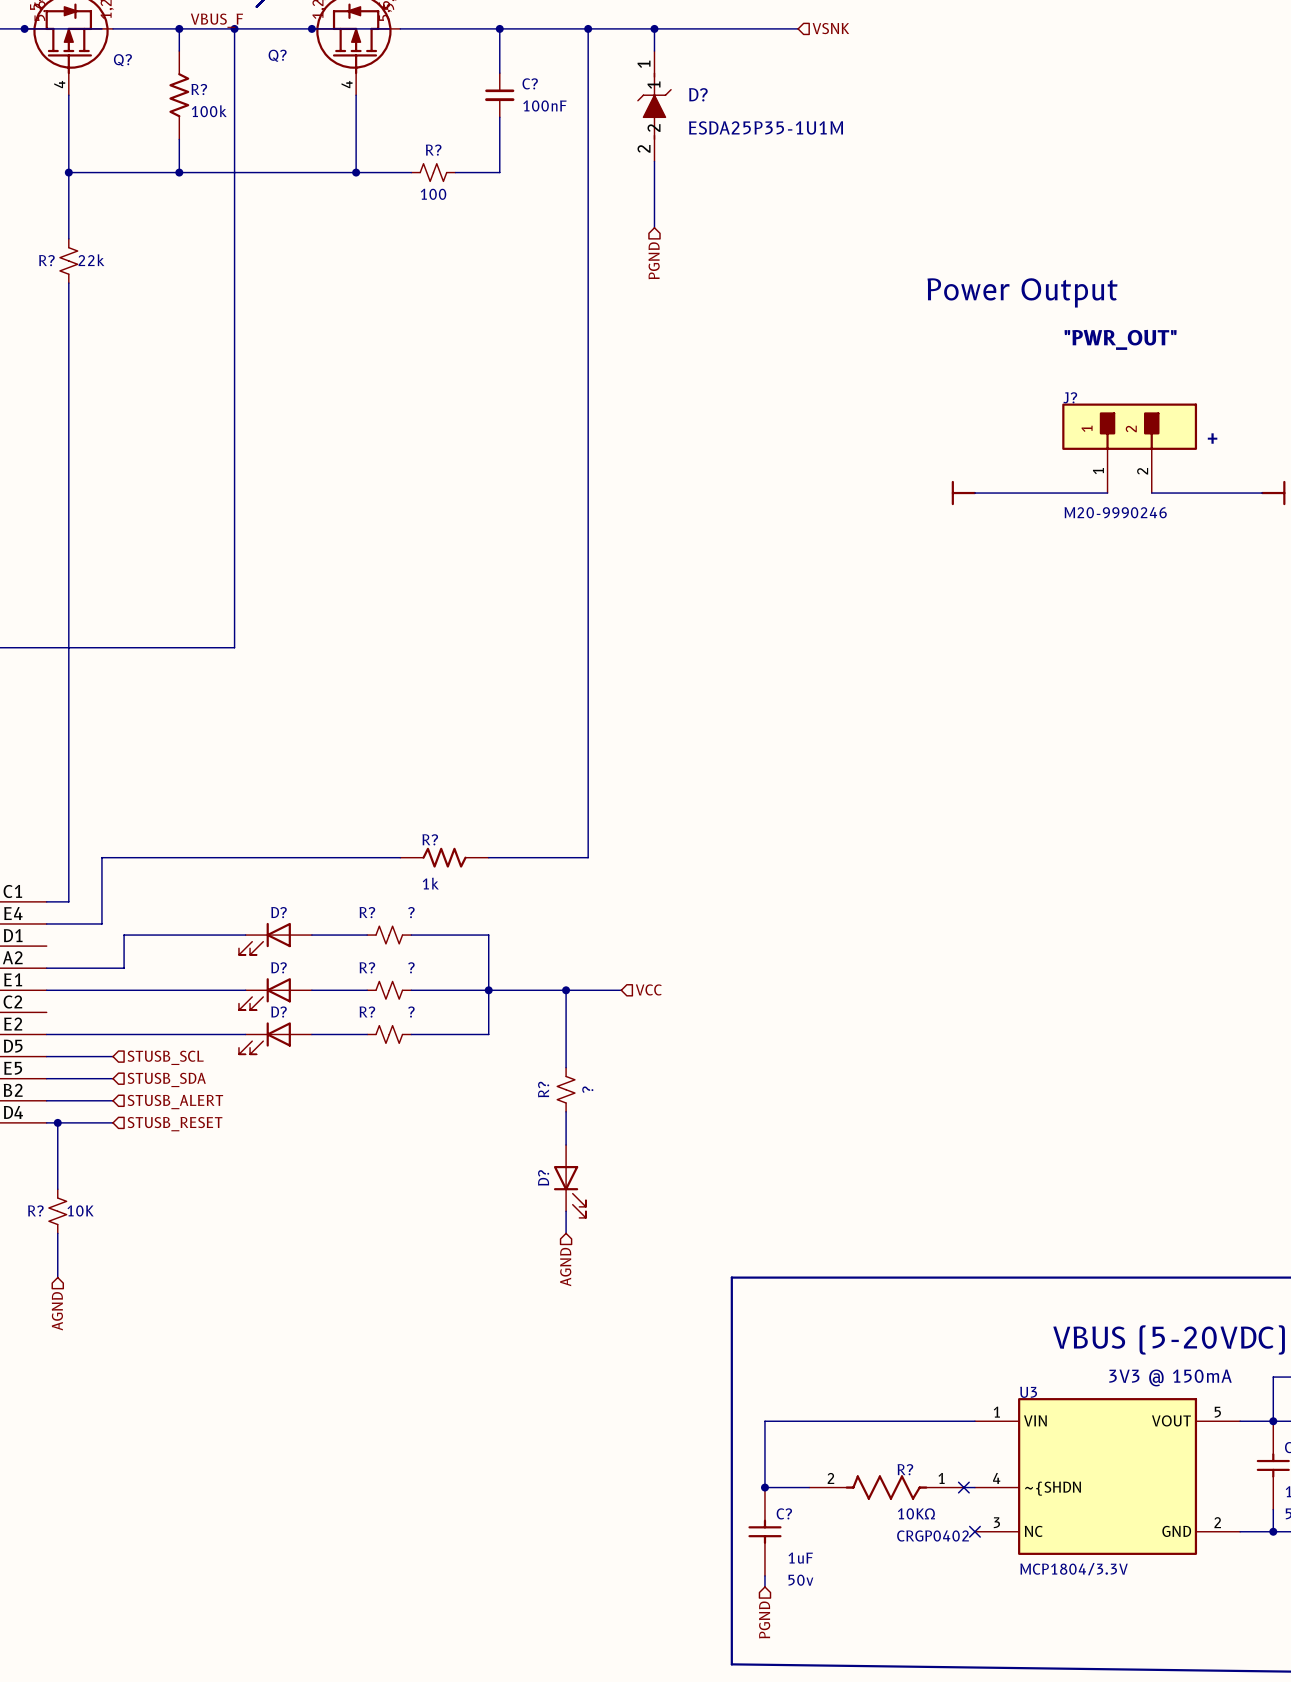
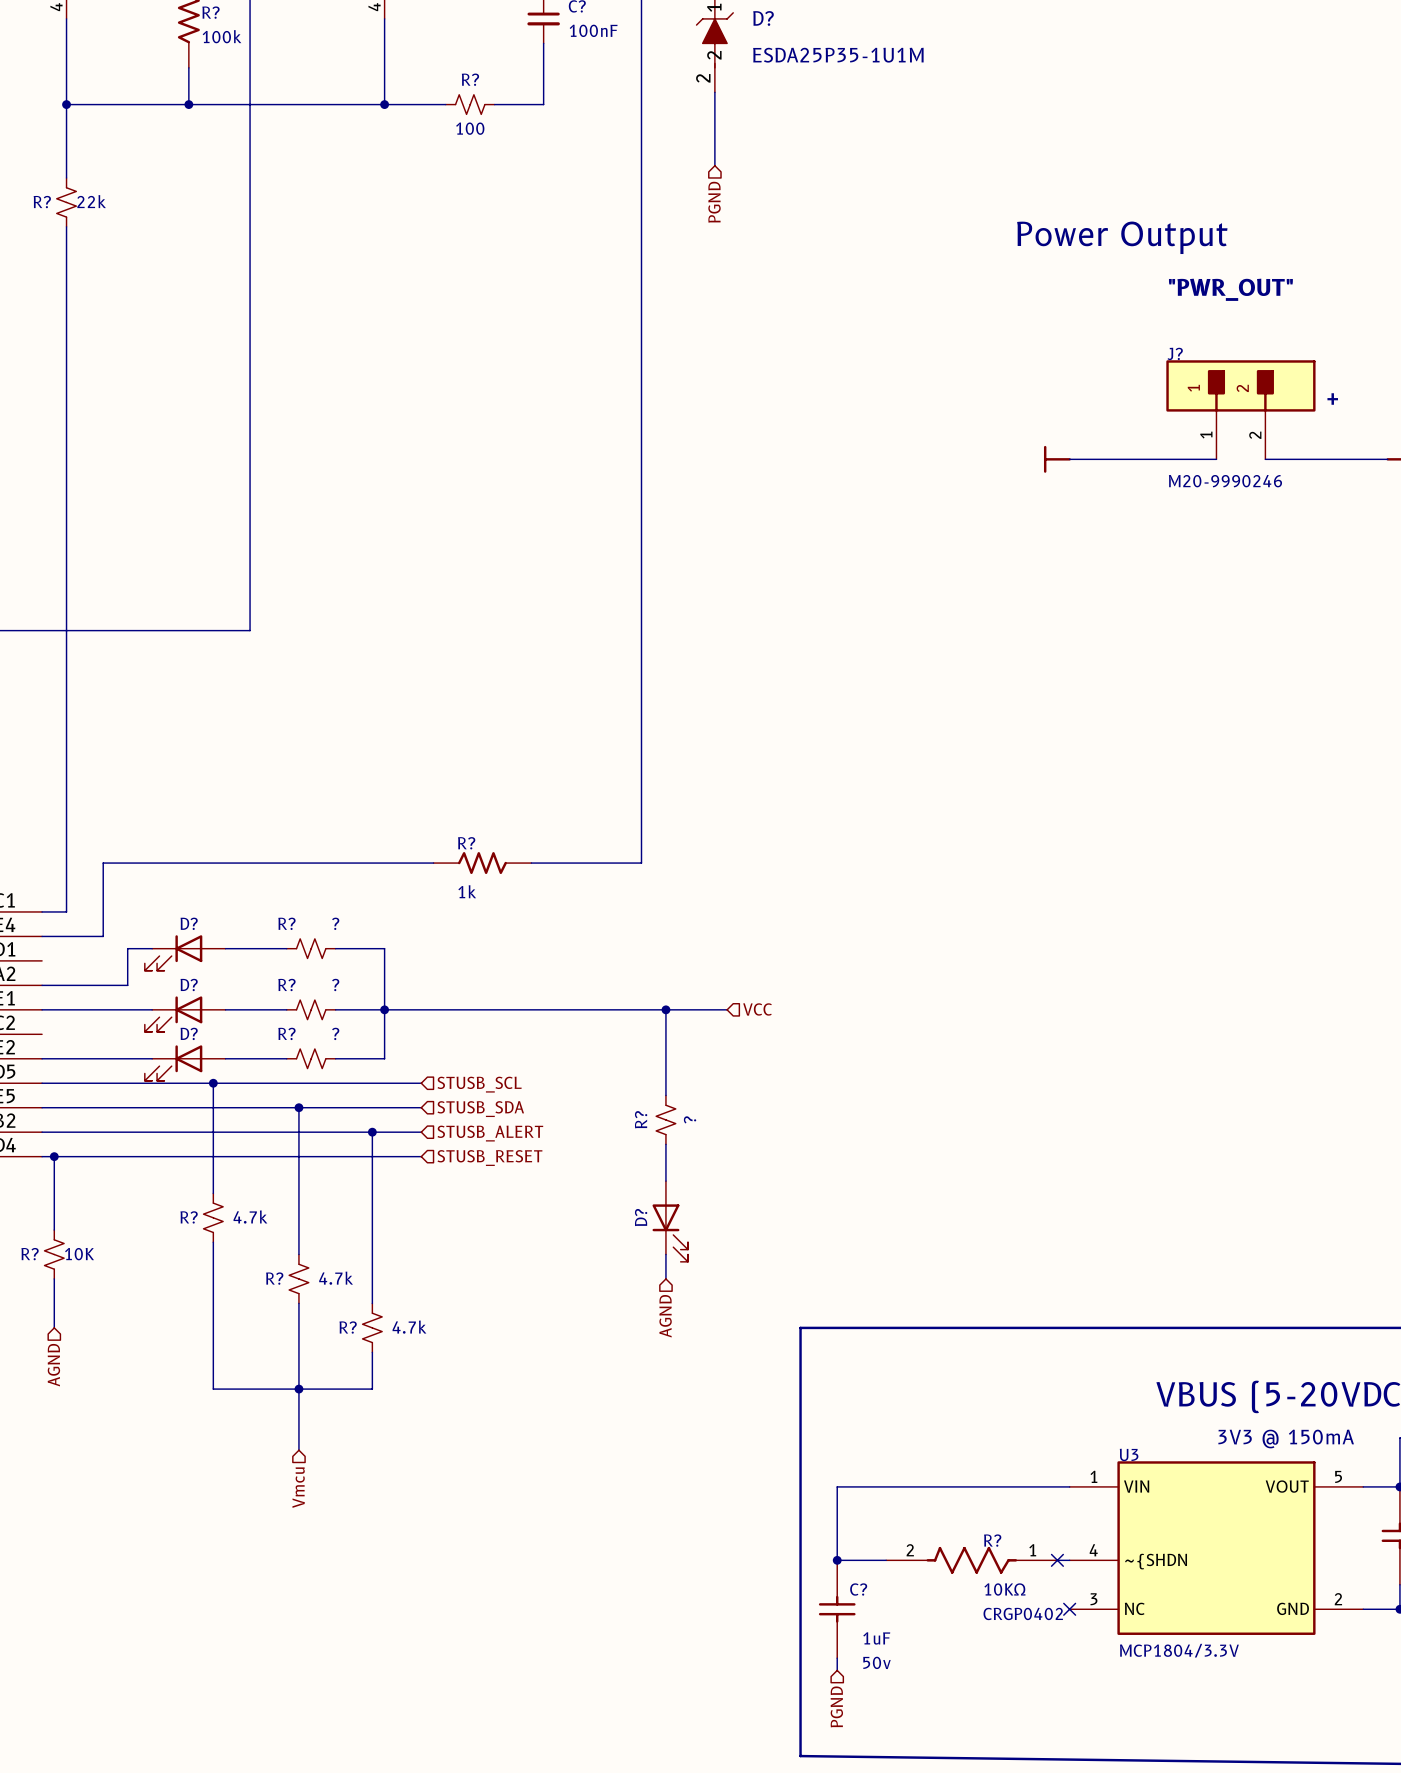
R?: none -> ? (311, 948)
wire: (356, 935) (367, 935) -> (384, 948) (384, 1058)
R?: ? (389, 935) -> none
wire: (411, 935) (488, 935) (488, 1034) (411, 1034) -> none
D?: none -> (185, 952)
D?: (275, 938) -> none
hierarchical label position: VCC (648, 989) -> VCC (757, 1009)
R?: none -> ? (311, 1009)
junction: none -> (384, 1009)
R?: ? (389, 990) -> none
junction: (488, 990) -> none
wire: (566, 990) (566, 1067) -> (665, 1009) (665, 1095)
junction position: (566, 990) -> (665, 1009)
wire: none -> (678, 1009) (727, 1009)
D?: none -> (185, 1014)
D?: (275, 994) -> none
R?: none -> ? (311, 1058)
wire: (356, 1034) (367, 1034) -> none
R?: ? (389, 1034) -> none
D?: none -> (185, 1063)
D?: (275, 1038) -> none
wire: none -> (115, 1083) (421, 1083)
wire: none -> (213, 1083) (213, 1193)
junction: none -> (213, 1083)
hierarchical label: STUSB_SCL (165, 1057) -> none
hierarchical label: none -> STUSB_SCL (479, 1084)
wire: none -> (115, 1107) (421, 1107)
wire: none -> (298, 1107) (298, 1254)
junction: none -> (298, 1107)
hierarchical label: STUSB_SDA (166, 1079) -> none
hierarchical label: none -> STUSB_SDA (480, 1109)
R? position: (566, 1089) -> (665, 1119)
wire: none -> (115, 1132) (421, 1132)
wire: none -> (372, 1132) (372, 1303)
junction: none -> (372, 1132)
hierarchical label: STUSB_ALERT (175, 1102) -> none
hierarchical label: none -> STUSB_ALERT (490, 1133)
wire: (566, 1111) (566, 1144) -> (665, 1144) (665, 1181)
wire: none -> (115, 1156) (421, 1156)
hierarchical label: STUSB_RESET (175, 1124) -> none
hierarchical label: none -> STUSB_RESET (489, 1158)
R?: none -> 4.7k (213, 1217)
D? position: (569, 1181) -> (670, 1221)
wire: none -> (213, 1242) (213, 1389) (372, 1389) (372, 1352)
wire: (566, 1211) (566, 1233) -> (665, 1254) (665, 1278)
R?: none -> 4.7k (298, 1278)
wire: none -> (298, 1303) (298, 1450)
hierarchical label position: AGND (565, 1267) -> AGND (665, 1316)
R?: none -> 4.7k (372, 1327)
junction: none -> (298, 1389)
hierarchical label: none -> Vmcu (298, 1487)

